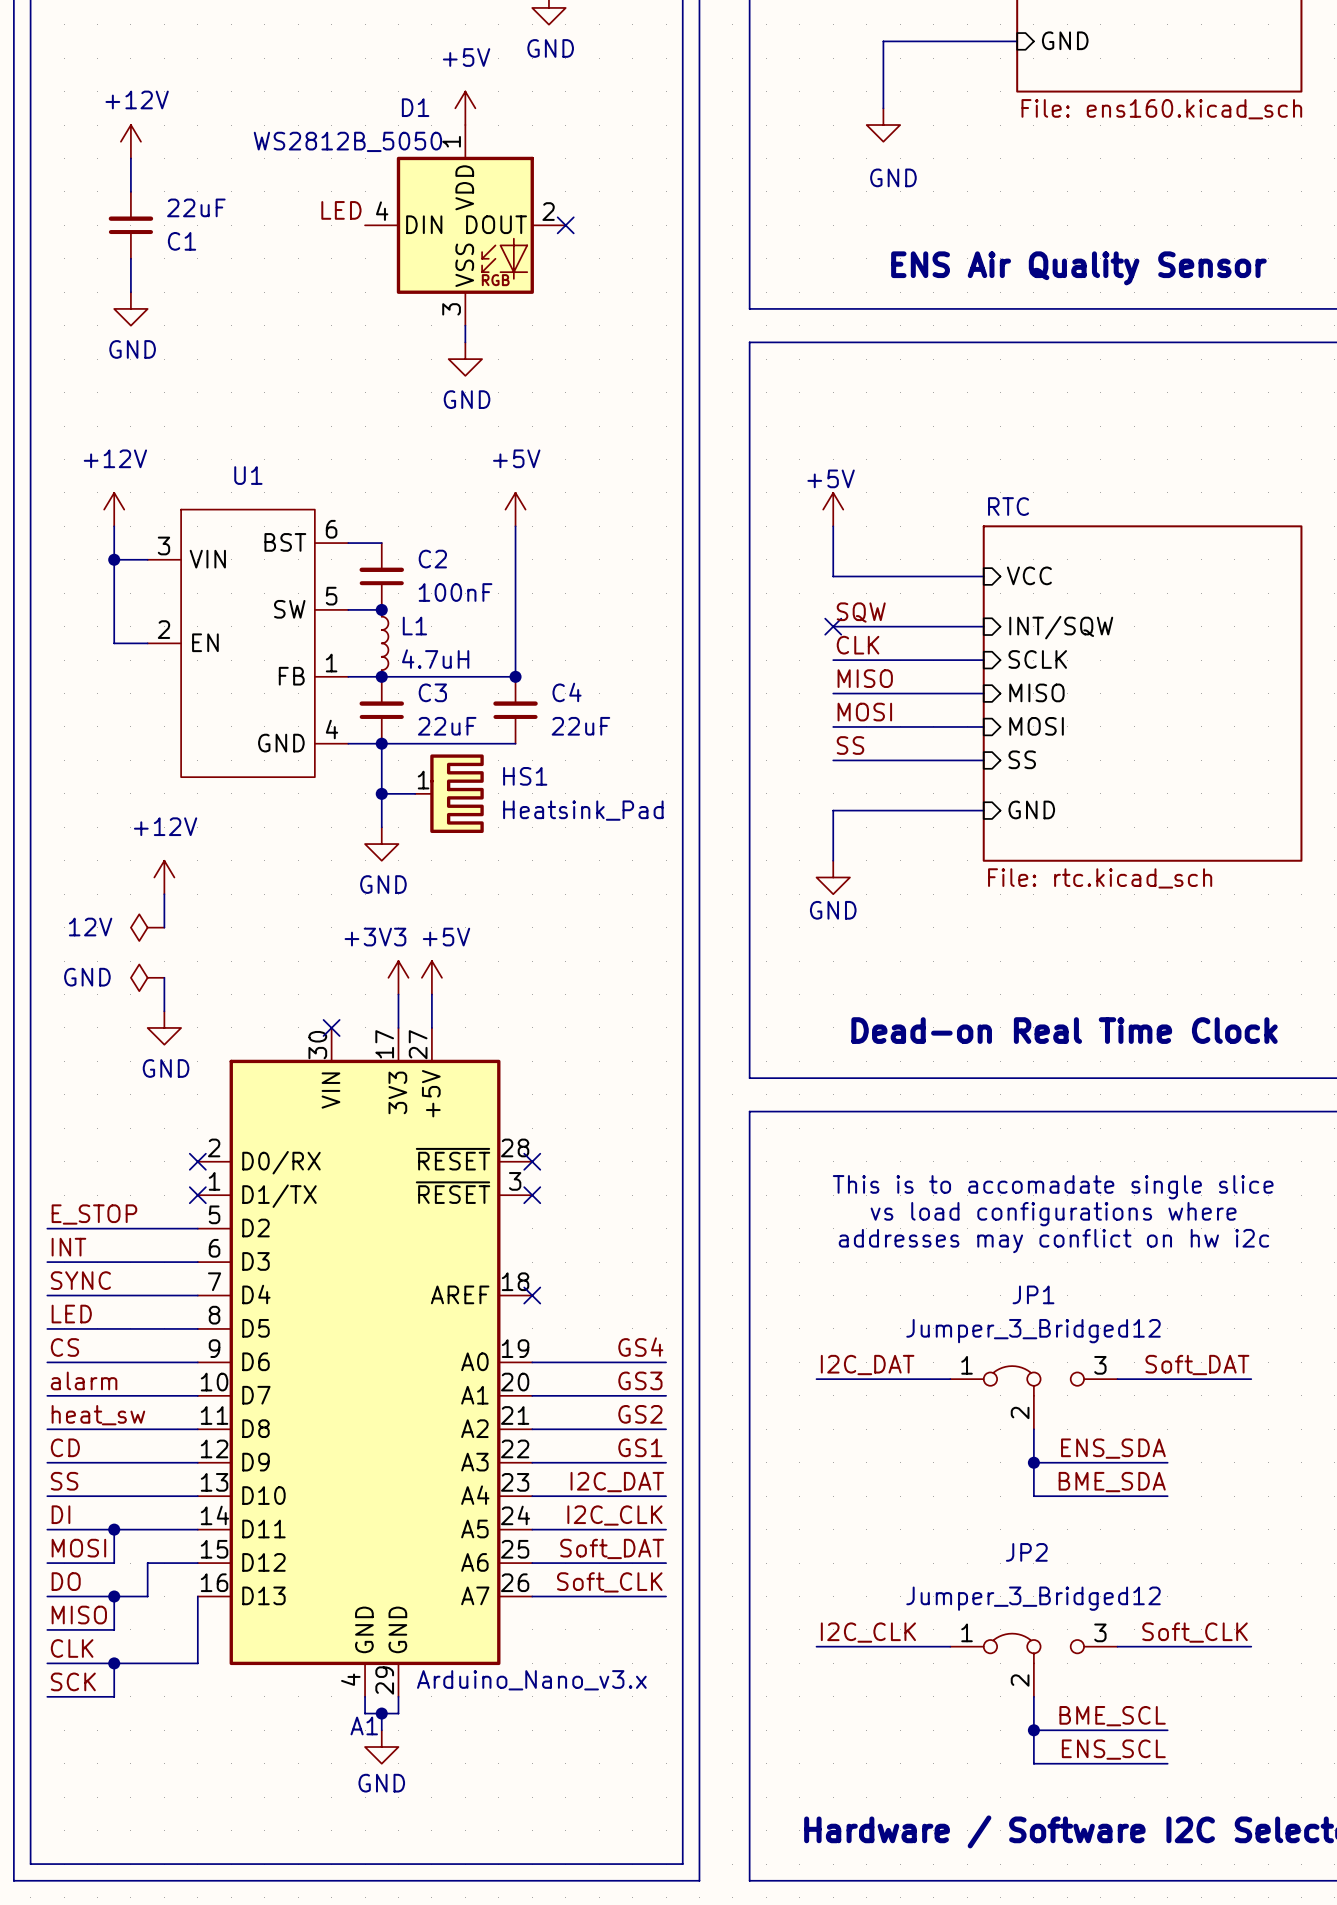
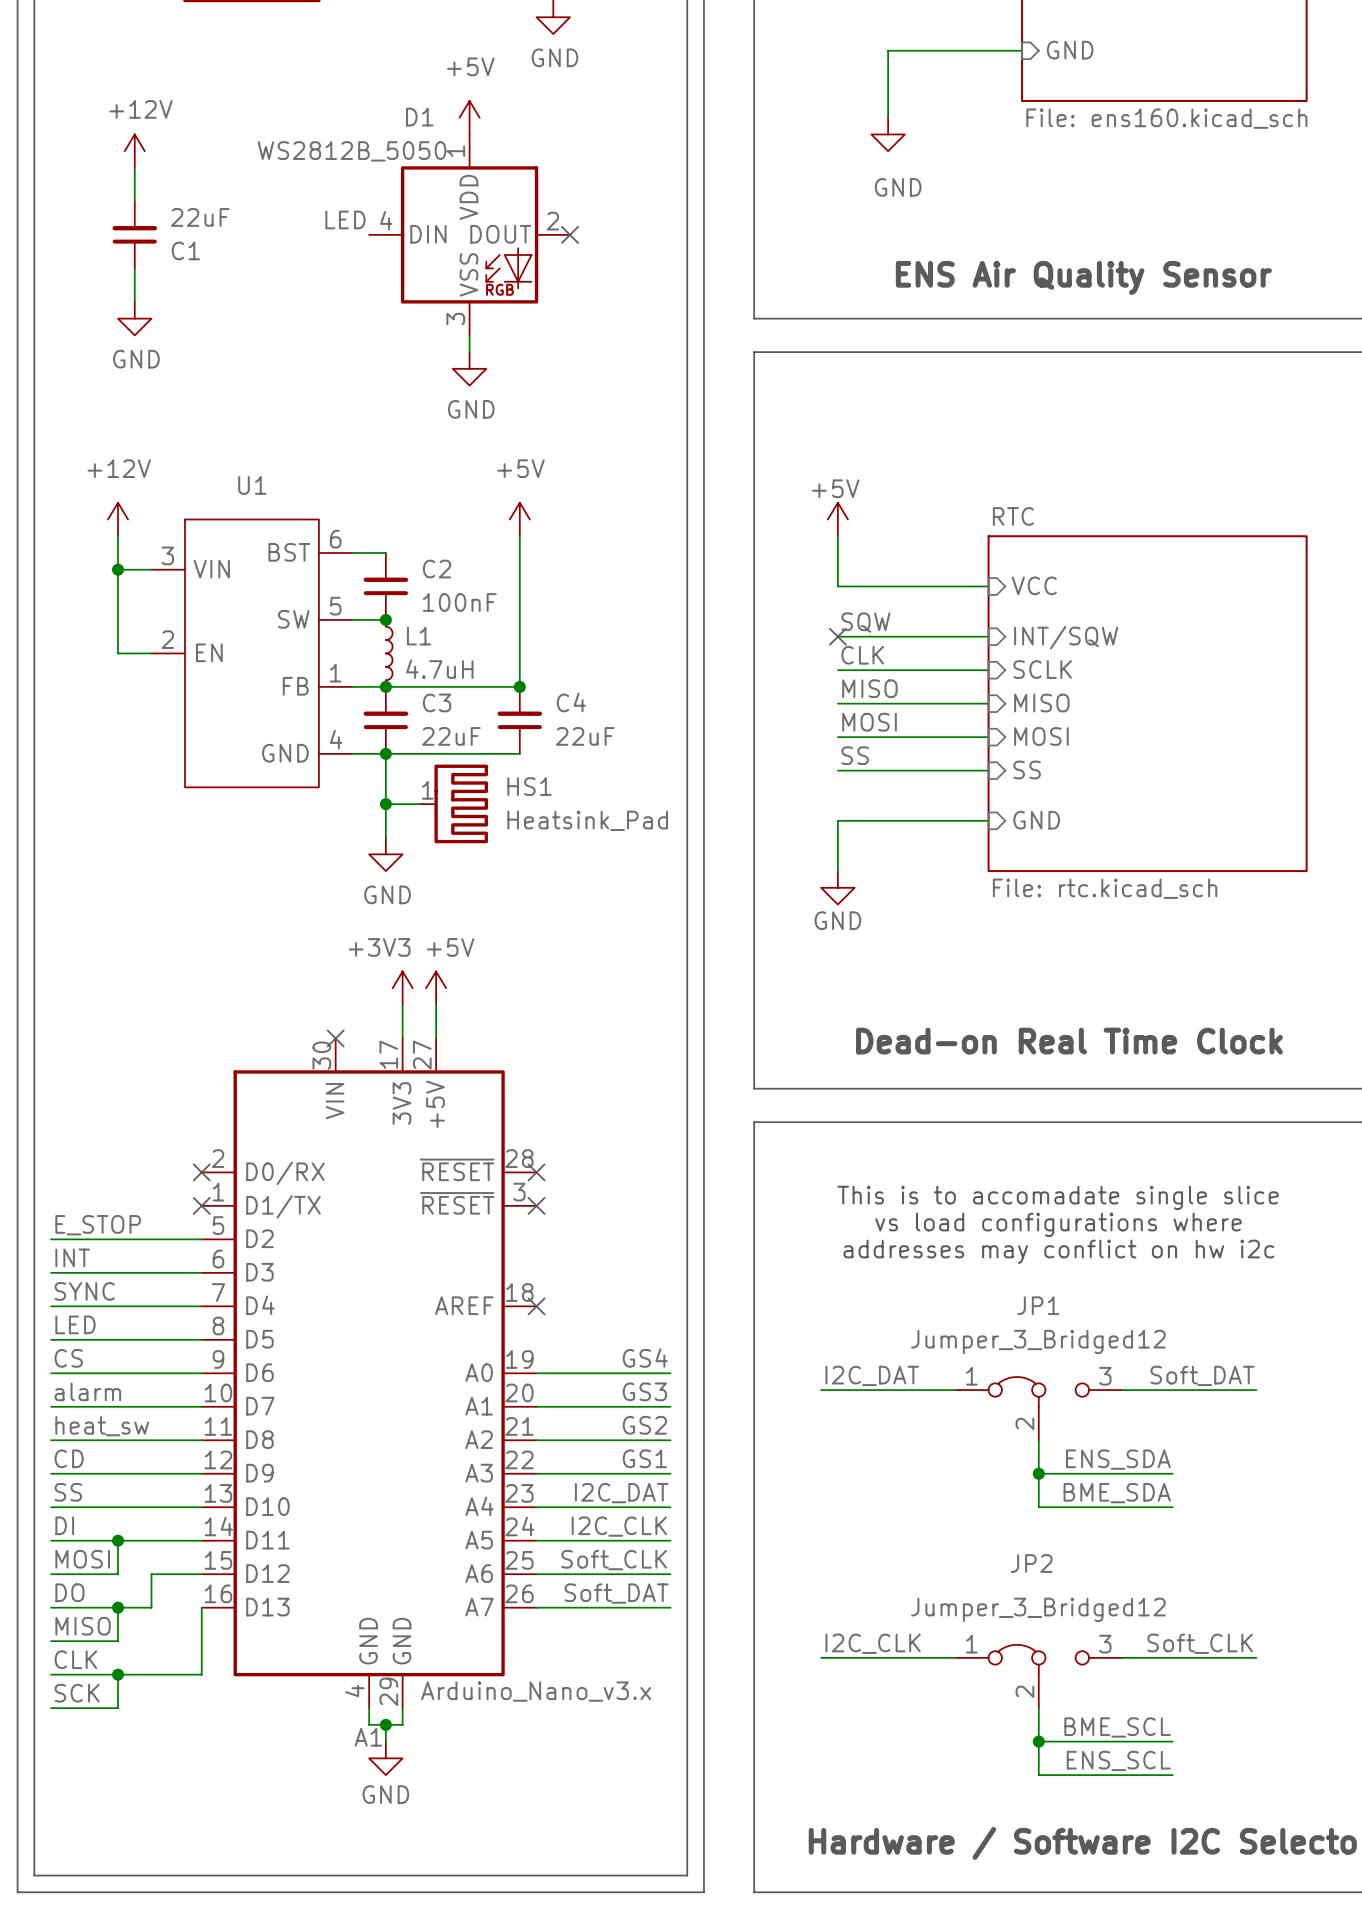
power symbol: +12V (164, 877) -> none
wire: (164, 894) (164, 927) -> none
power symbol: 12V (147, 927) -> none
power symbol: GND (147, 977) -> none
wire: (164, 977) (164, 1011) -> none
power symbol: GND (164, 1027) -> none
label: Soft_DAT (612, 1548) -> Soft_CLK (614, 1560)
label: Soft_CLK (609, 1582) -> Soft_DAT (616, 1593)

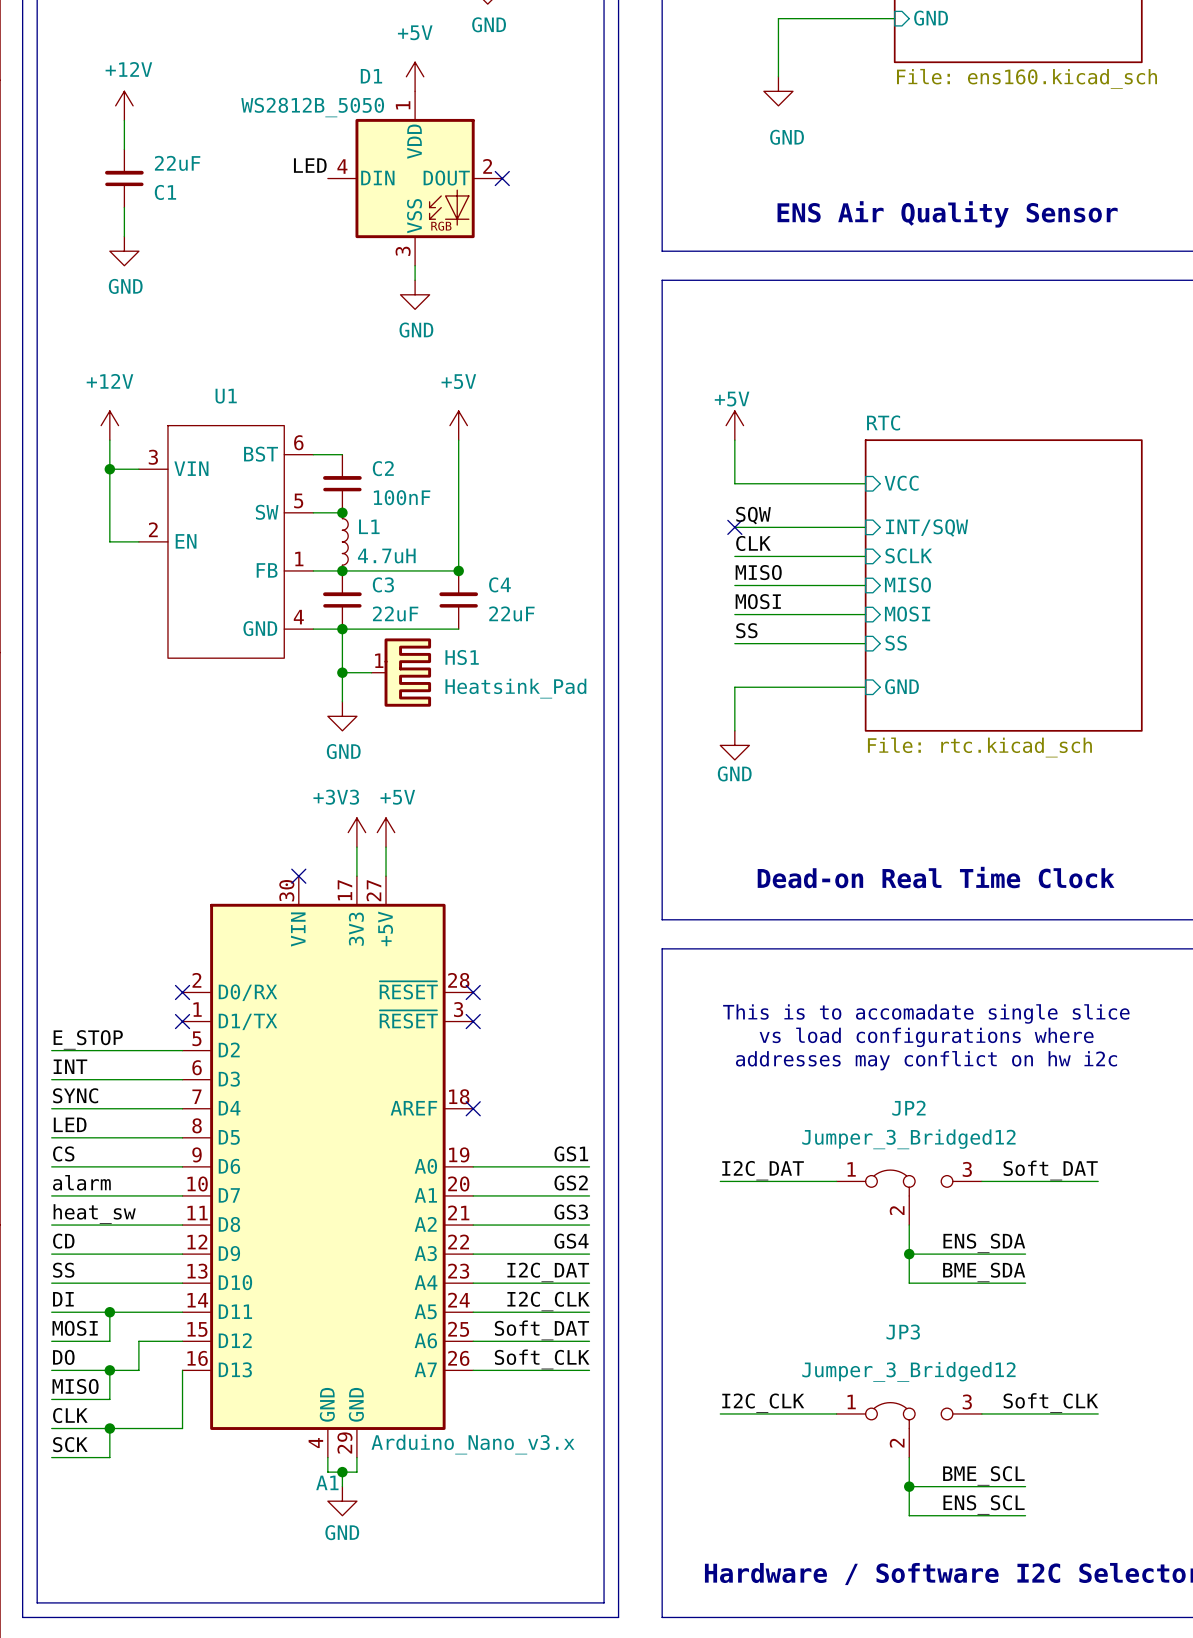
JP1 name: JP1 (1038, 1305) -> JP2 (908, 1108)
label: GS4 (645, 1357) -> GS1 (571, 1153)
label: GS3 (644, 1391) -> GS2 (571, 1183)
label: GS2 (644, 1425) -> GS3 (571, 1212)
label: GS1 (644, 1458) -> GS4 (571, 1241)
label: Soft_CLK (614, 1560) -> Soft_DAT (541, 1330)
JP2 name: JP2 (1031, 1563) -> JP3 (903, 1332)
label: Soft_DAT (616, 1593) -> Soft_CLK (542, 1359)

